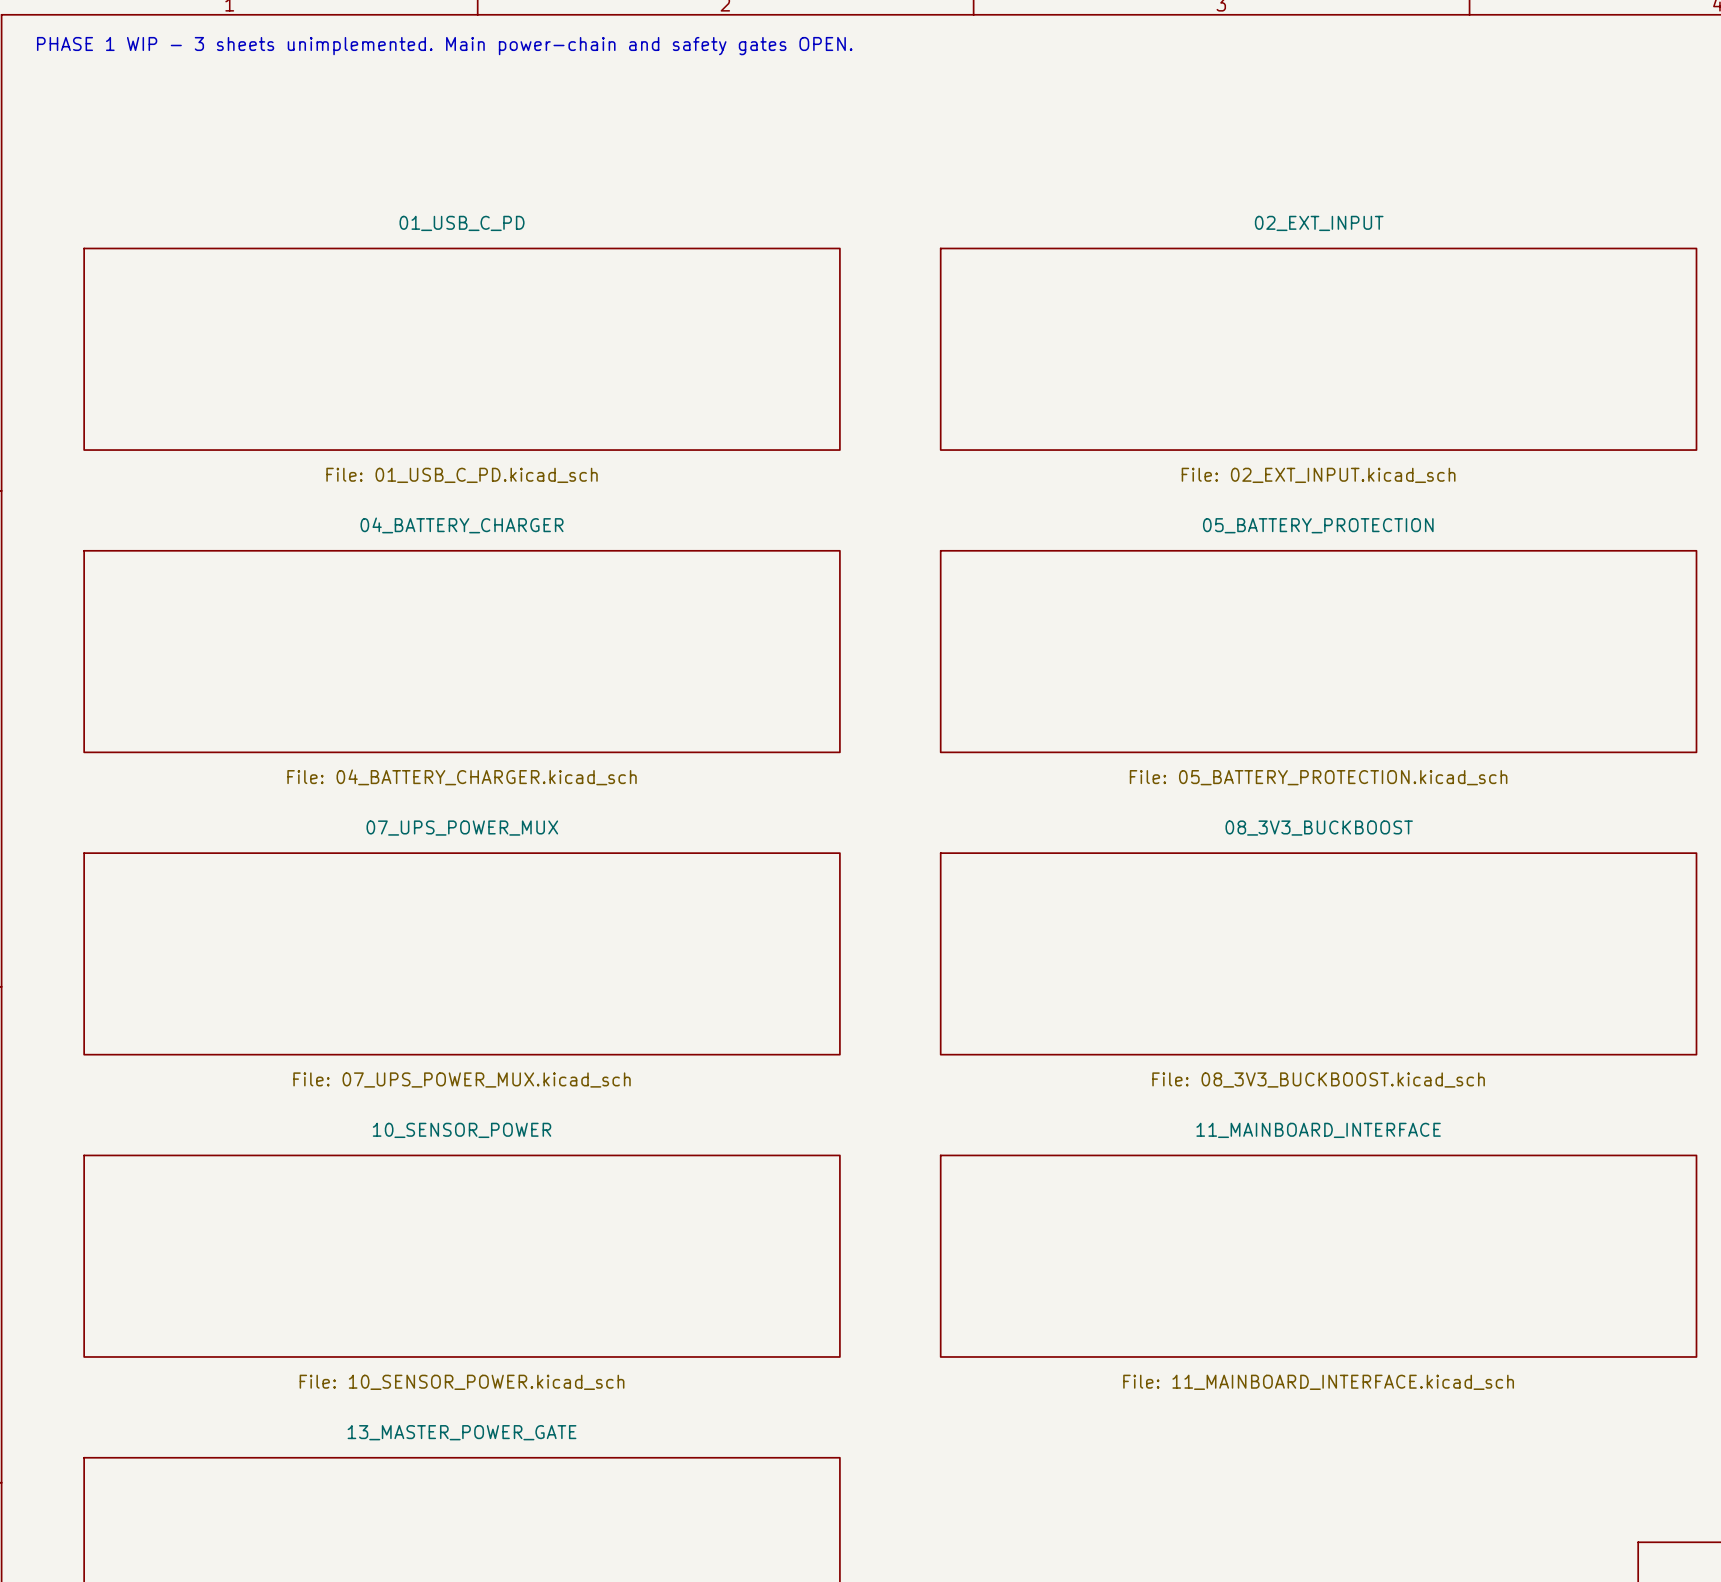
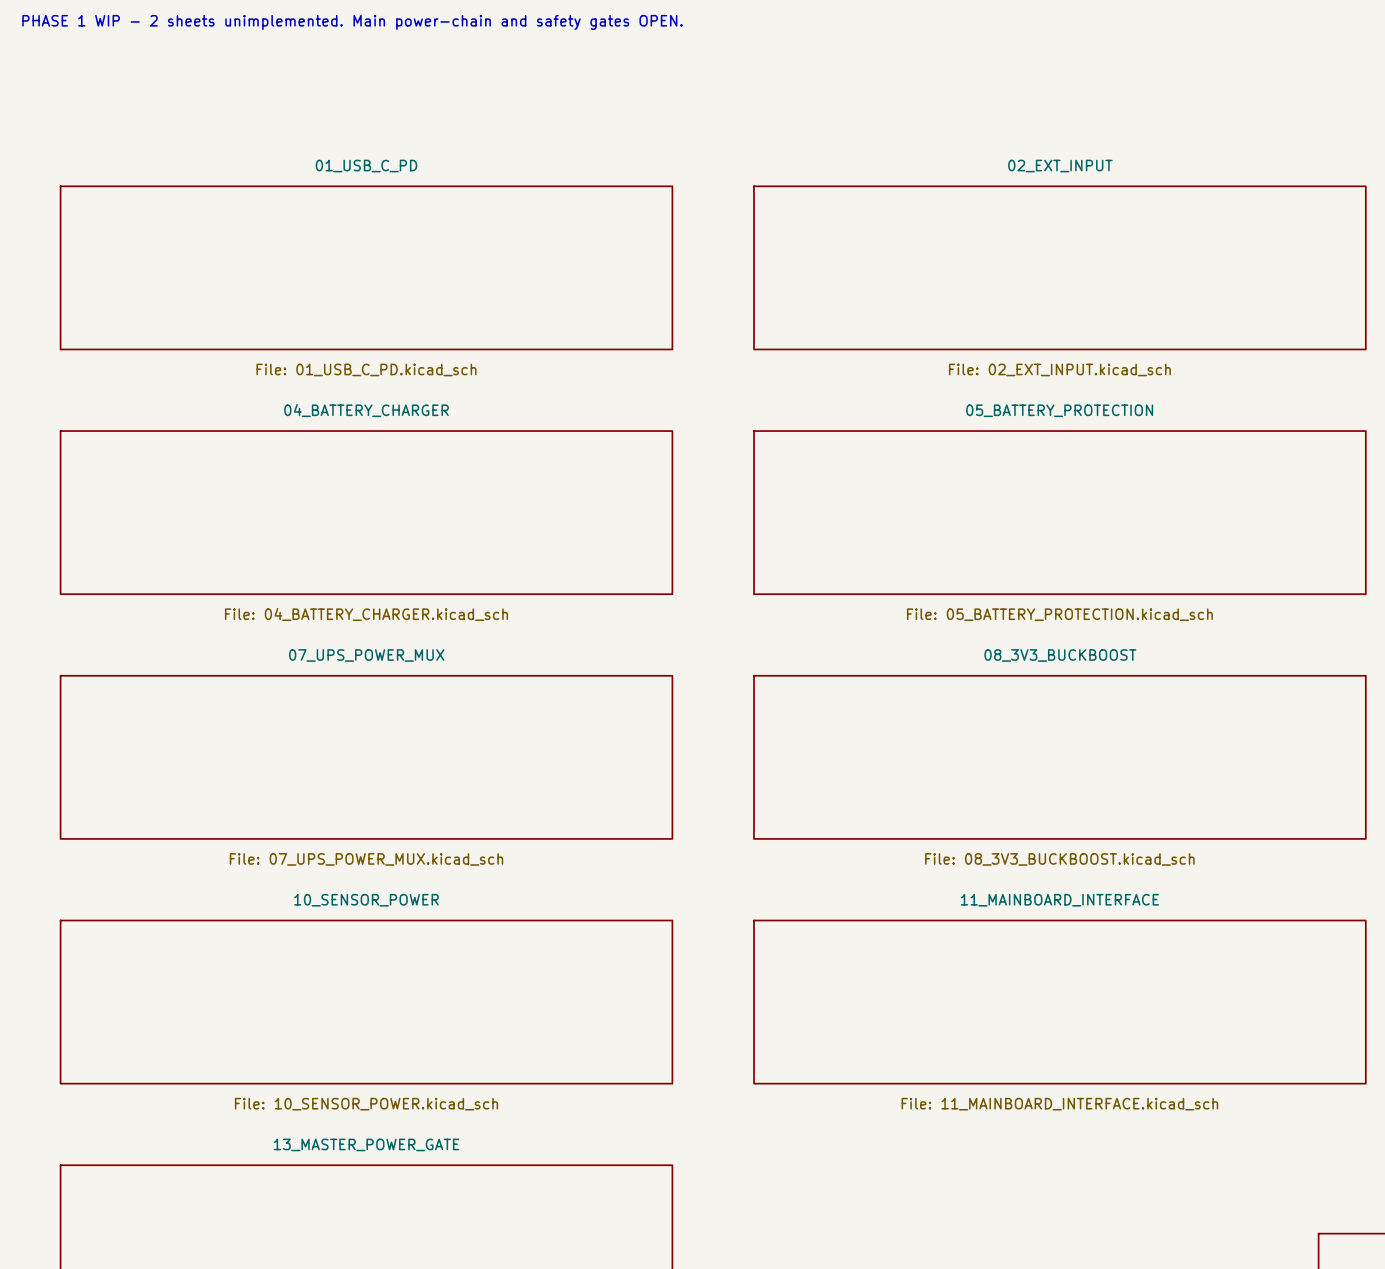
text: PHASE 1 WIP - 3 sheets unimplemented. Main power-chain and safety gates OPEN. (444, 46) -> PHASE 1 WIP - 2 sheets unimplemented. Main power-chain and safety gates OPEN. (352, 22)

